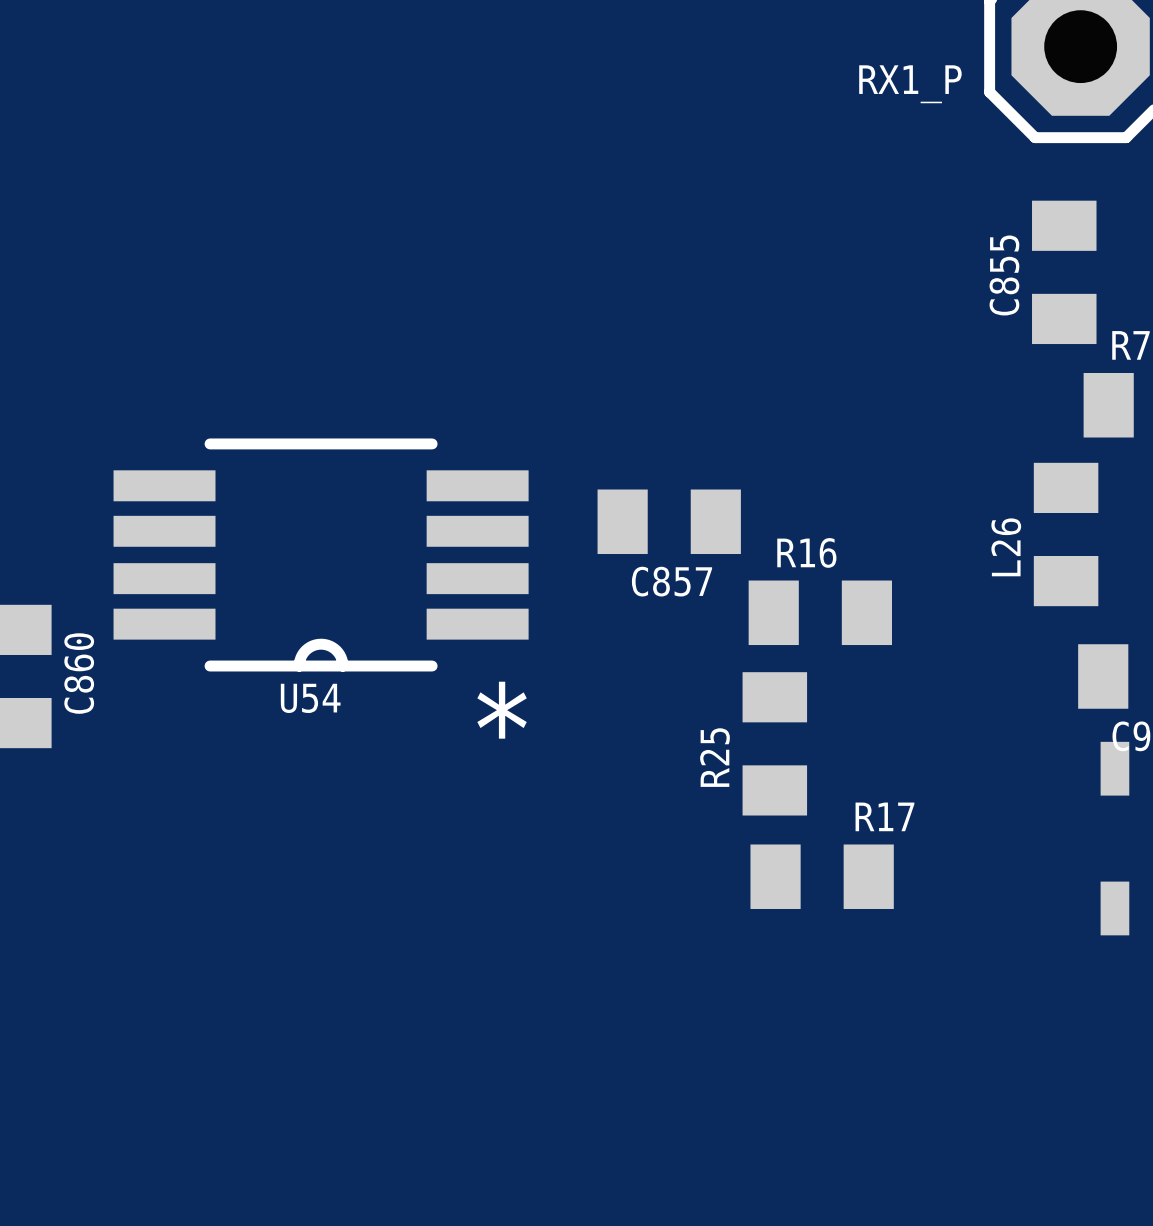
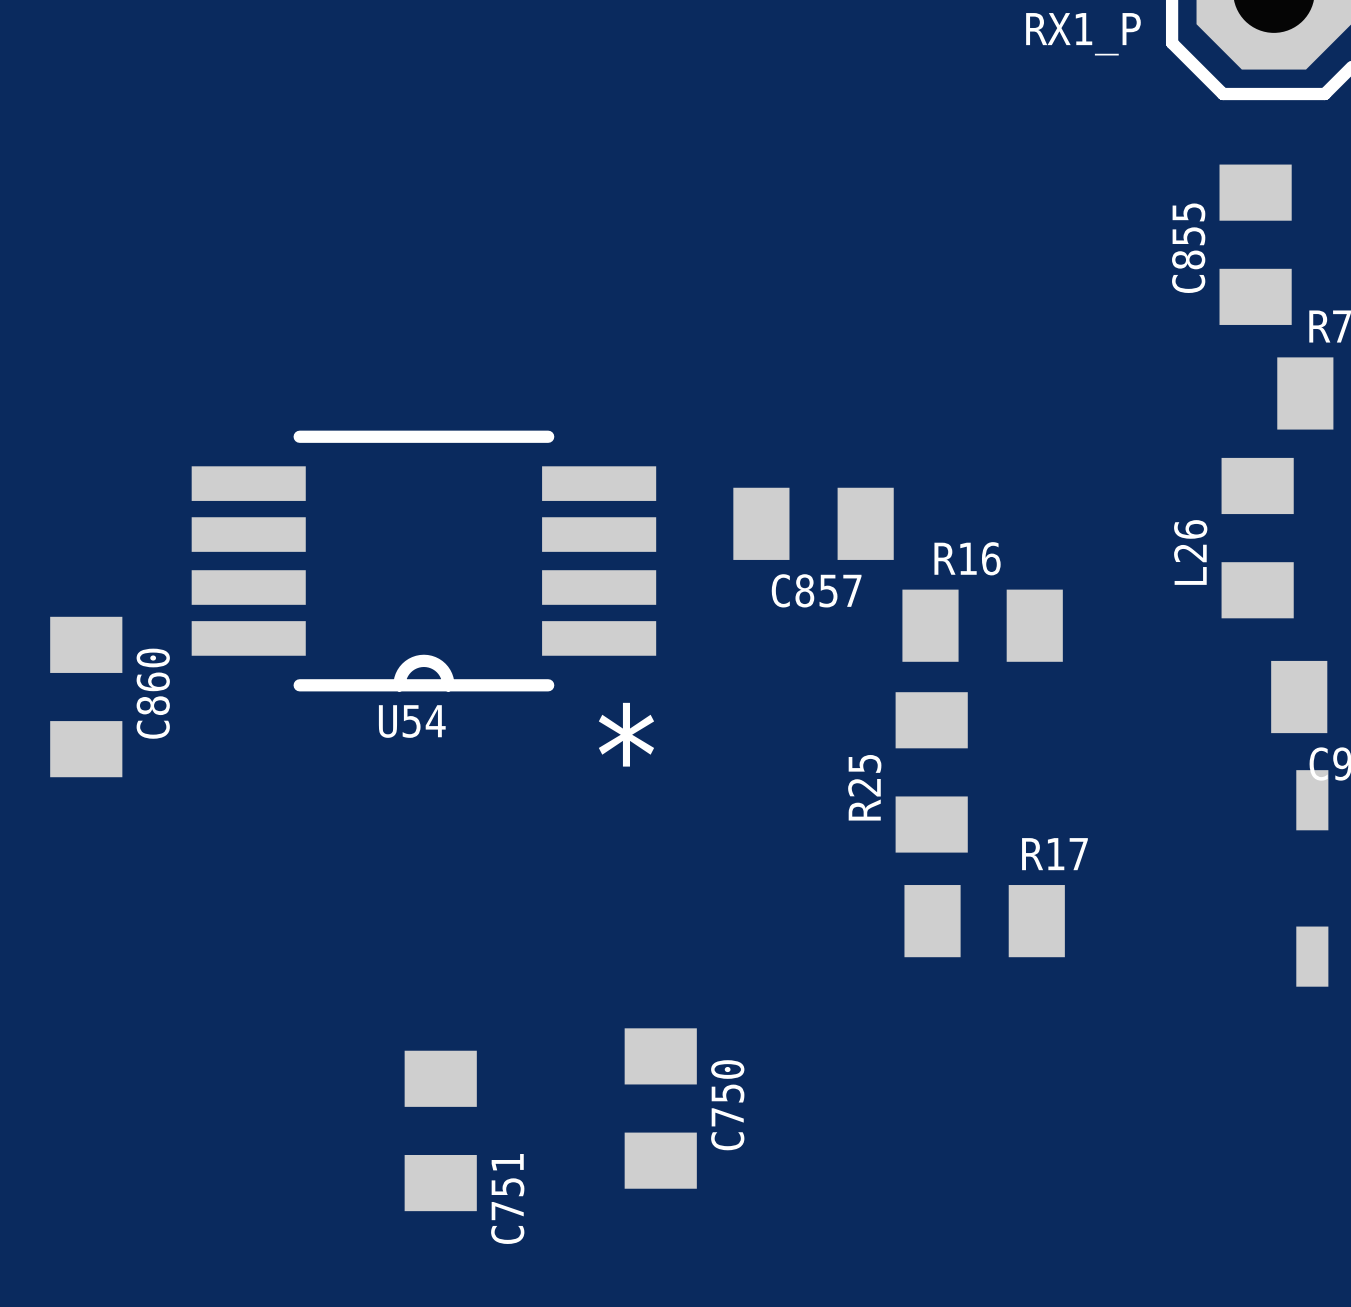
C750: none -> (660, 1108)
C751: none -> (440, 1130)

